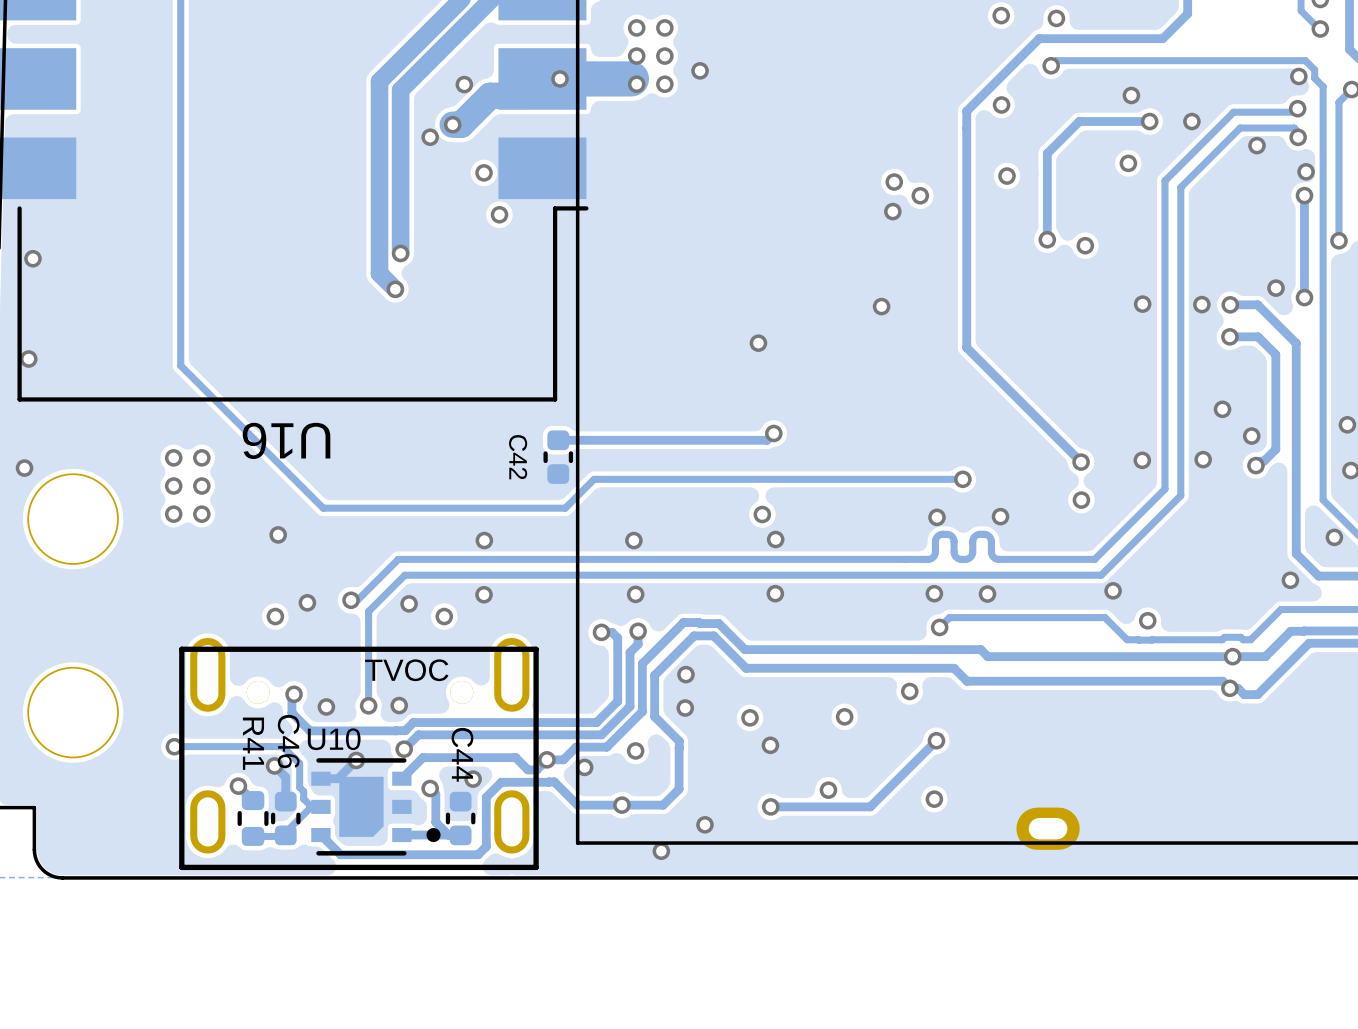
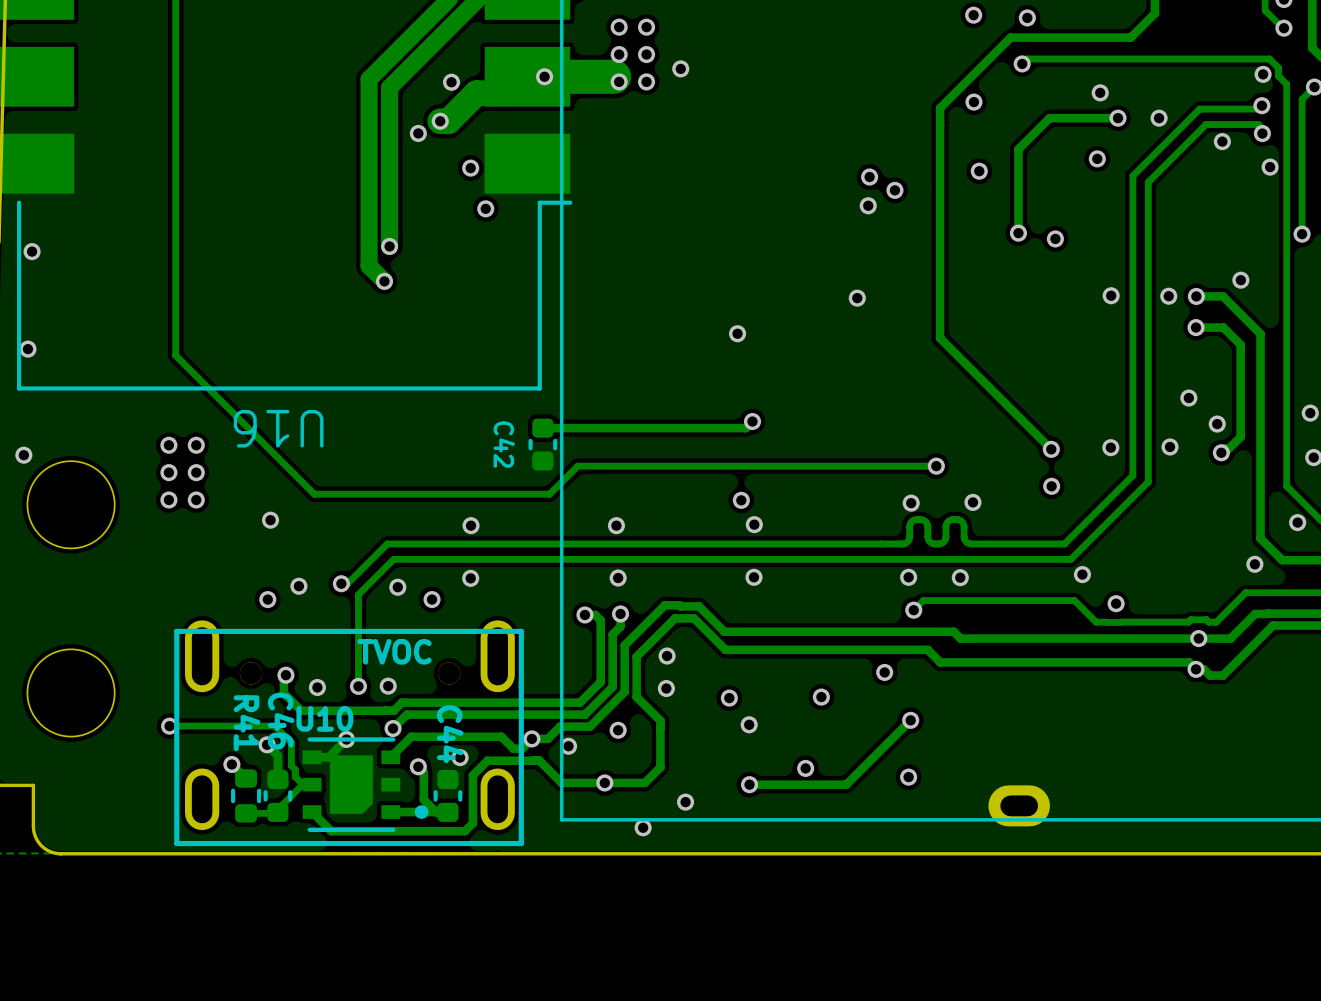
track: (1304, 195) (1304, 297) -> none
via: (1304, 195) -> none
via: (1304, 297) -> none

